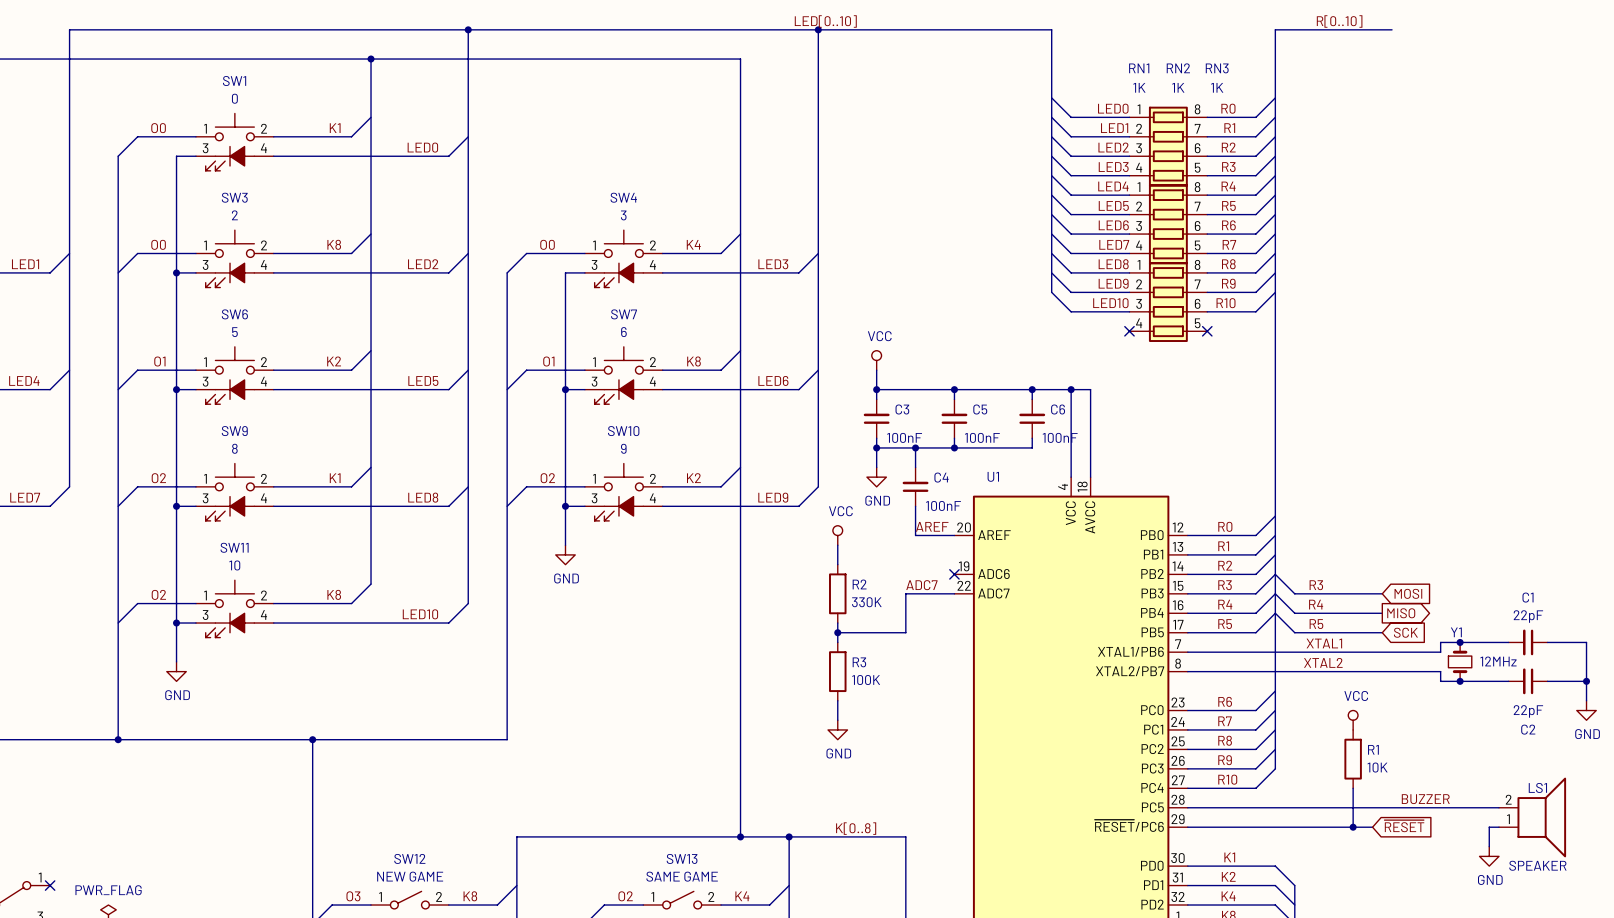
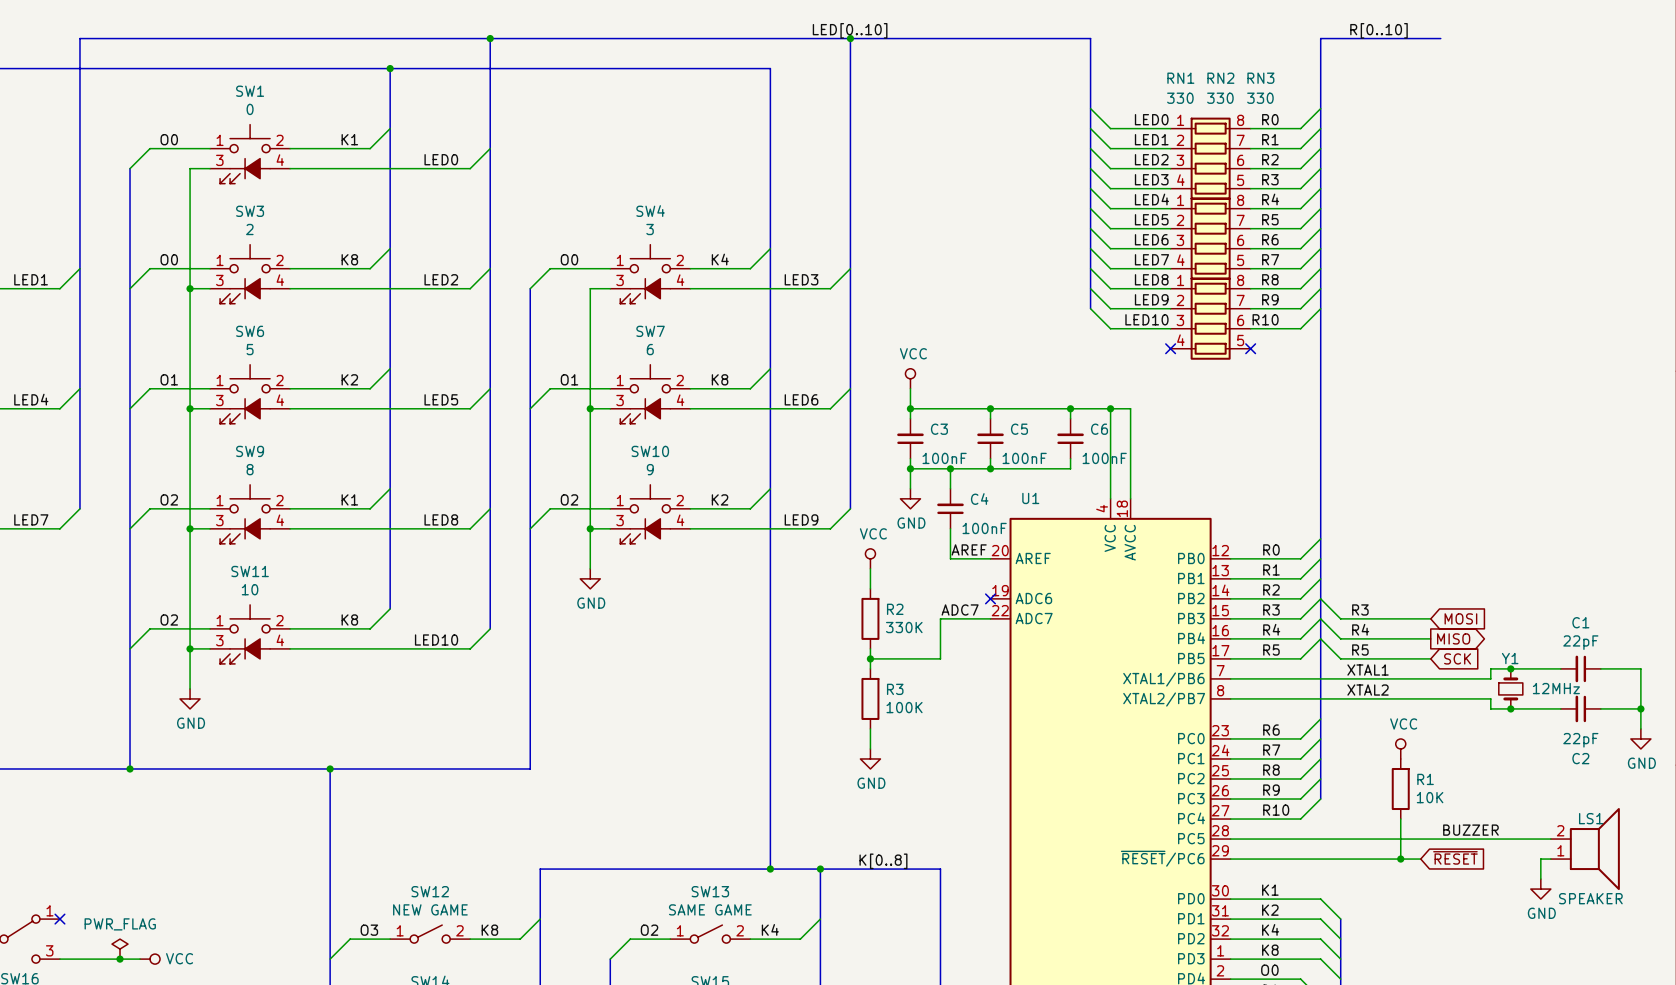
RN1 value: 1K (1139, 87) -> 330 (1180, 98)
RN2 value: 1K (1178, 87) -> 330 (1220, 98)
RN3 value: 1K (1217, 87) -> 330 (1260, 98)

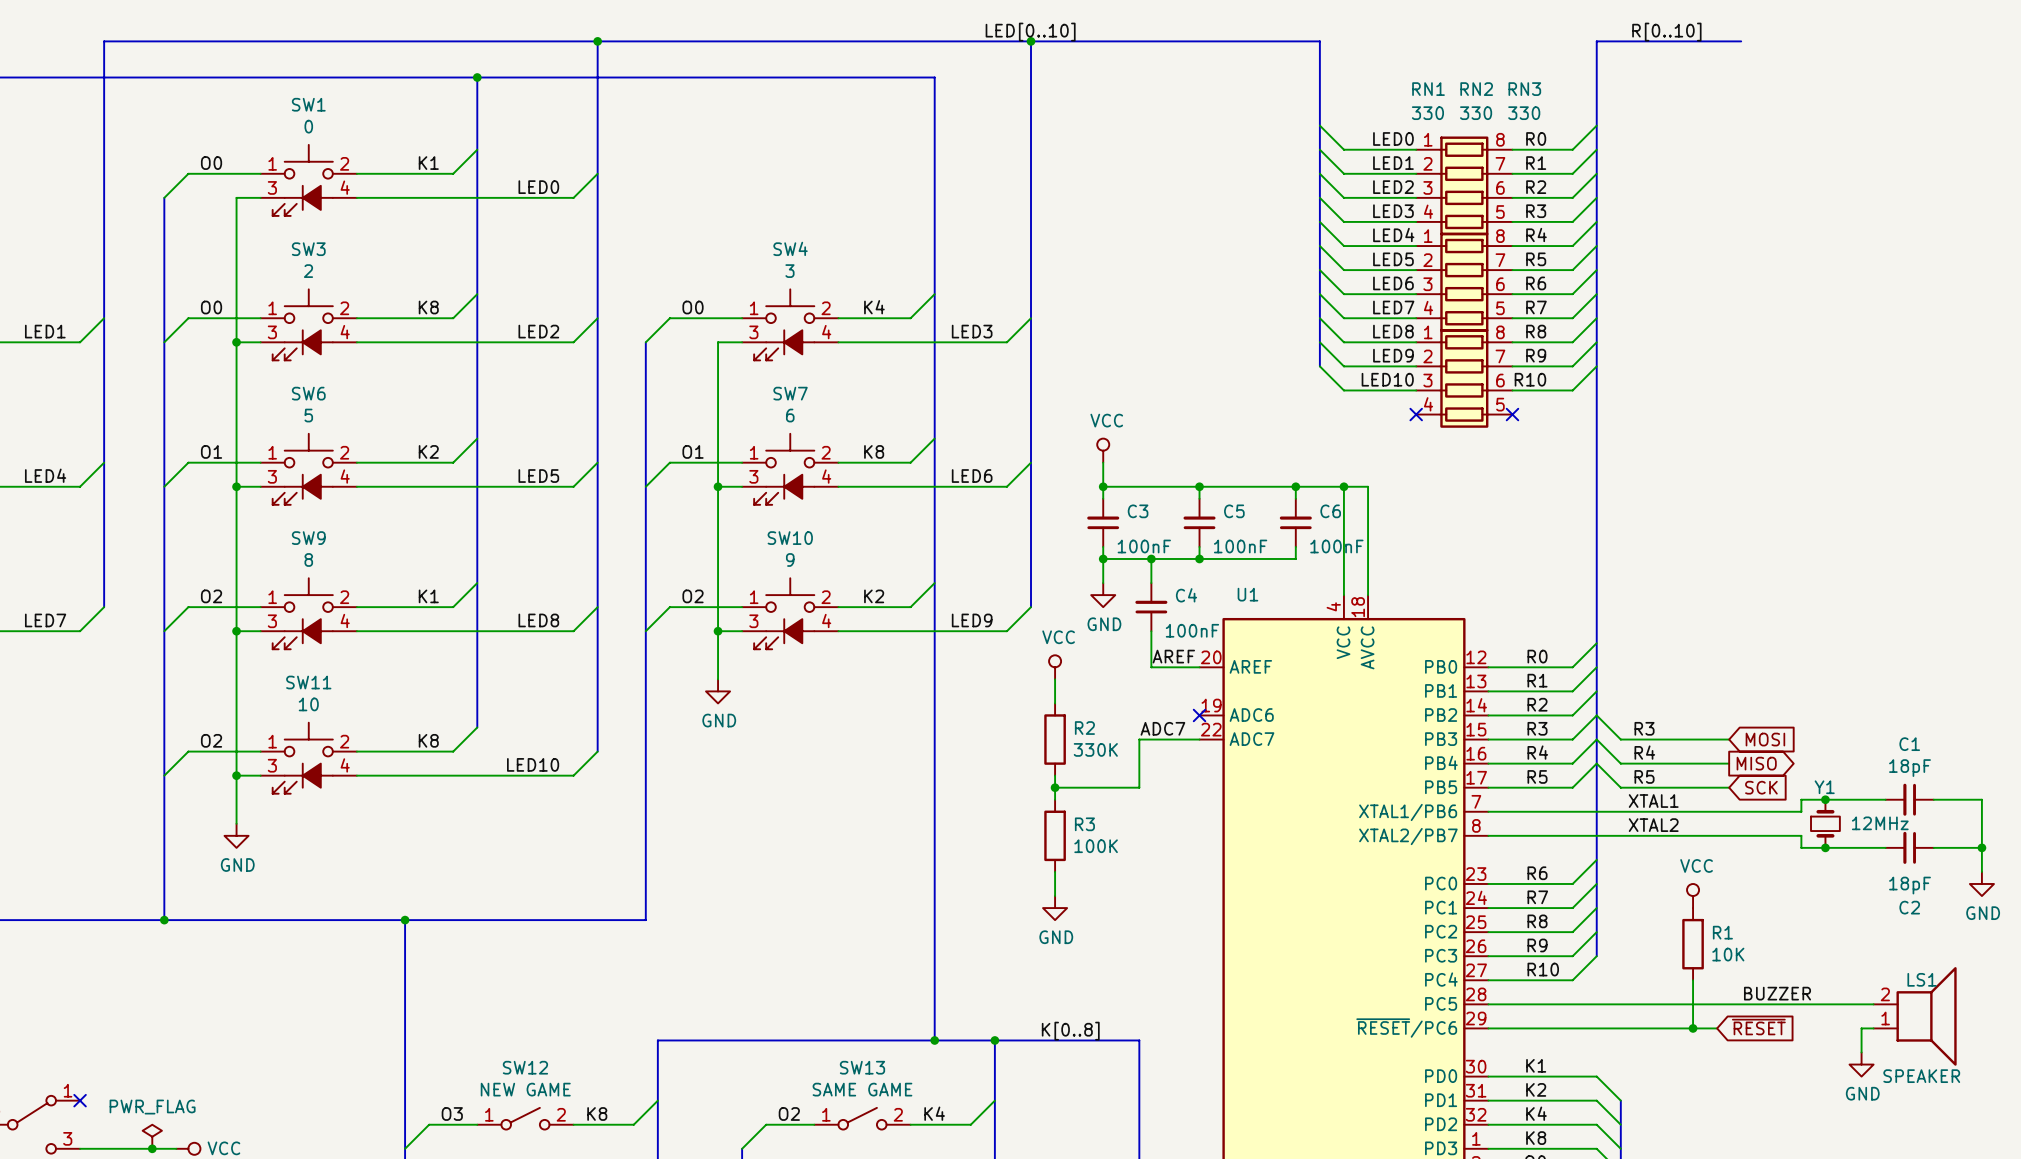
C1 value: 22pF (1580, 642) -> 18pF (1910, 768)
C2 value: 22pF (1580, 740) -> 18pF (1910, 885)

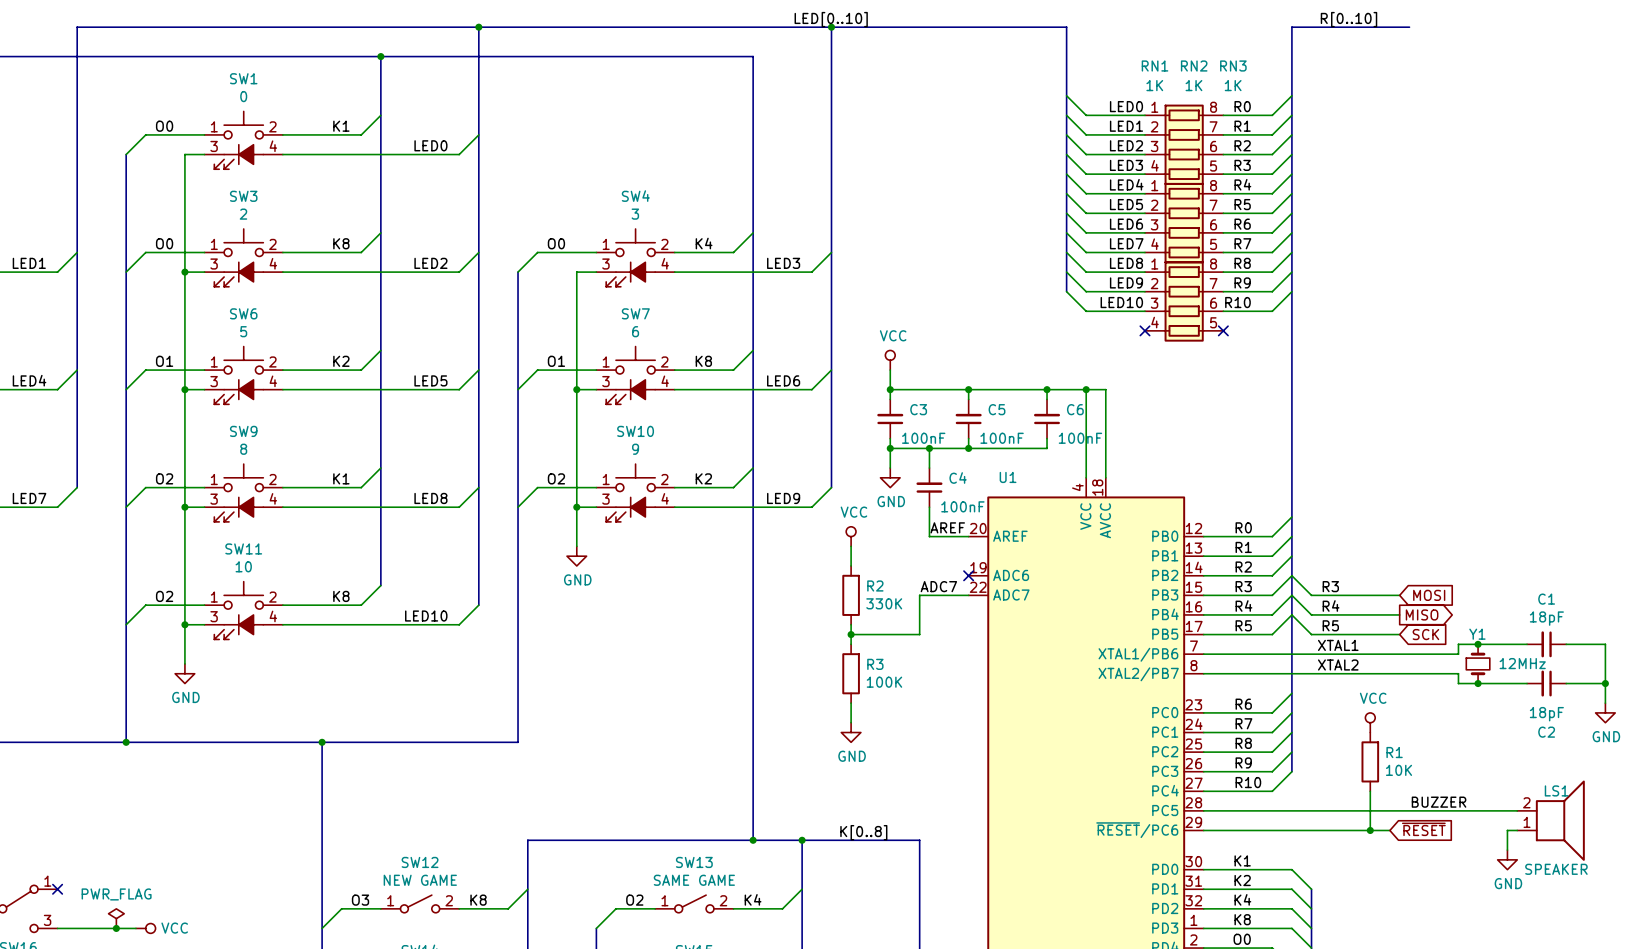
RN1 value: 330 (1427, 113) -> 1K (1154, 85)
RN2 value: 330 (1476, 113) -> 1K (1193, 85)
RN3 value: 330 (1524, 113) -> 1K (1233, 85)

